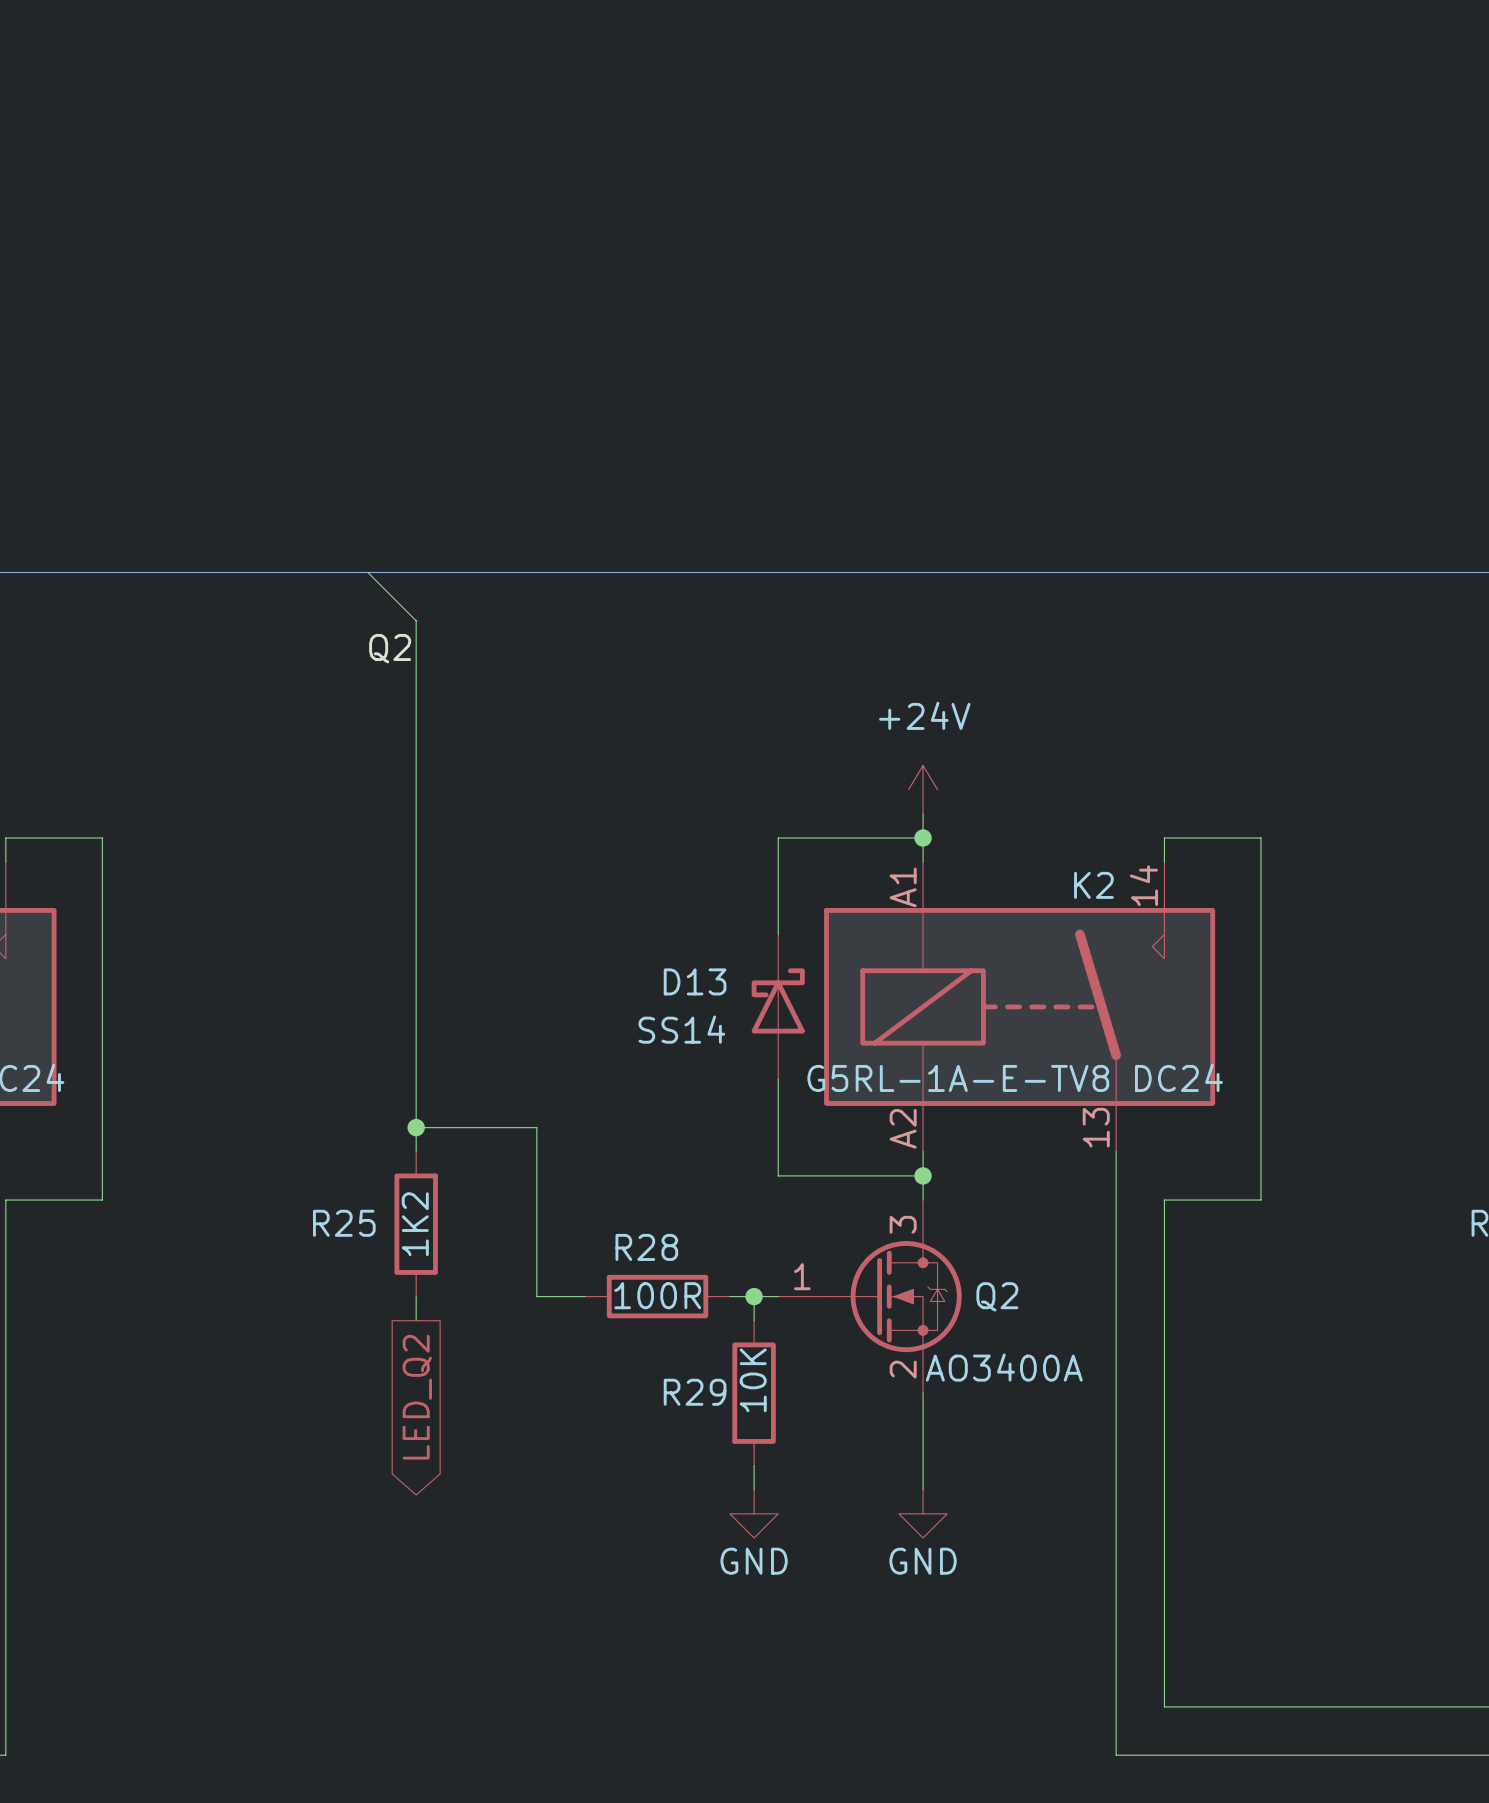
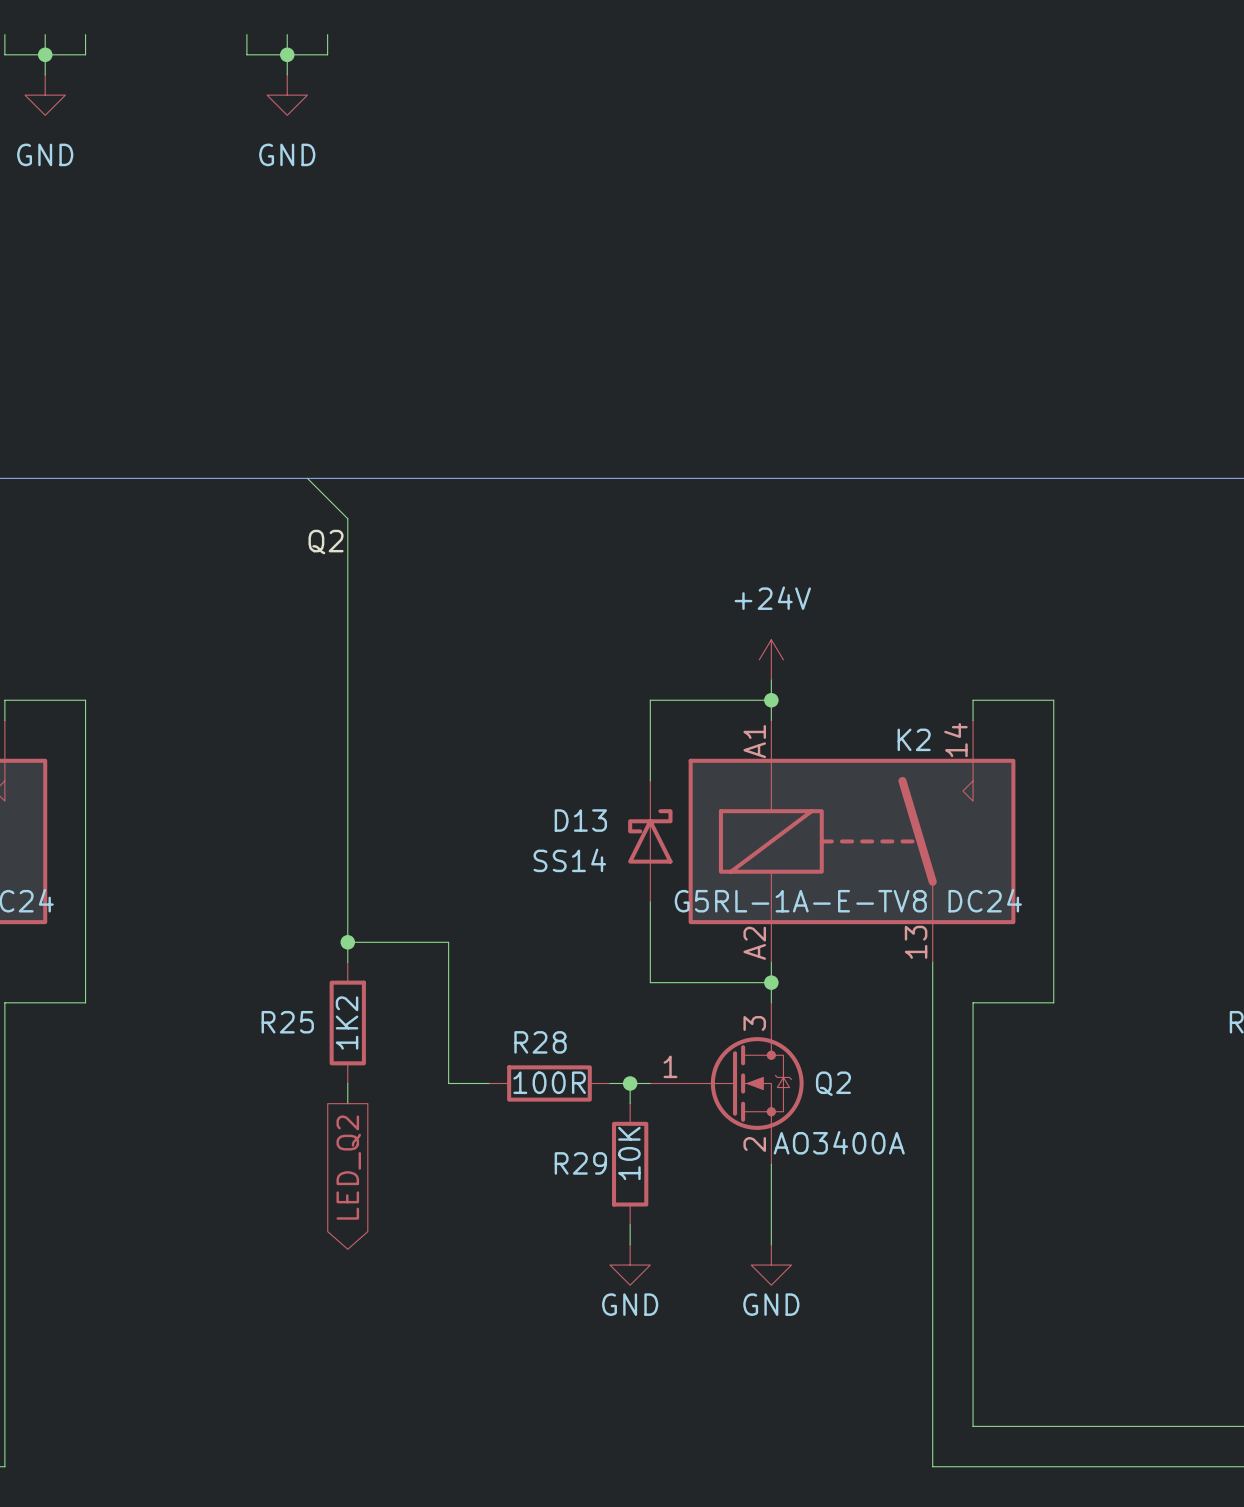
wire: none -> (4, 34) (4, 54) (85, 54) (85, 34)
wire: none -> (45, 34) (45, 74)
wire: none -> (246, 34) (246, 54) (327, 54) (327, 34)
wire: none -> (287, 34) (287, 74)
junction: none -> (45, 54)
junction: none -> (287, 54)
power symbol: none -> GND (45, 95)
power symbol: none -> GND (287, 95)

